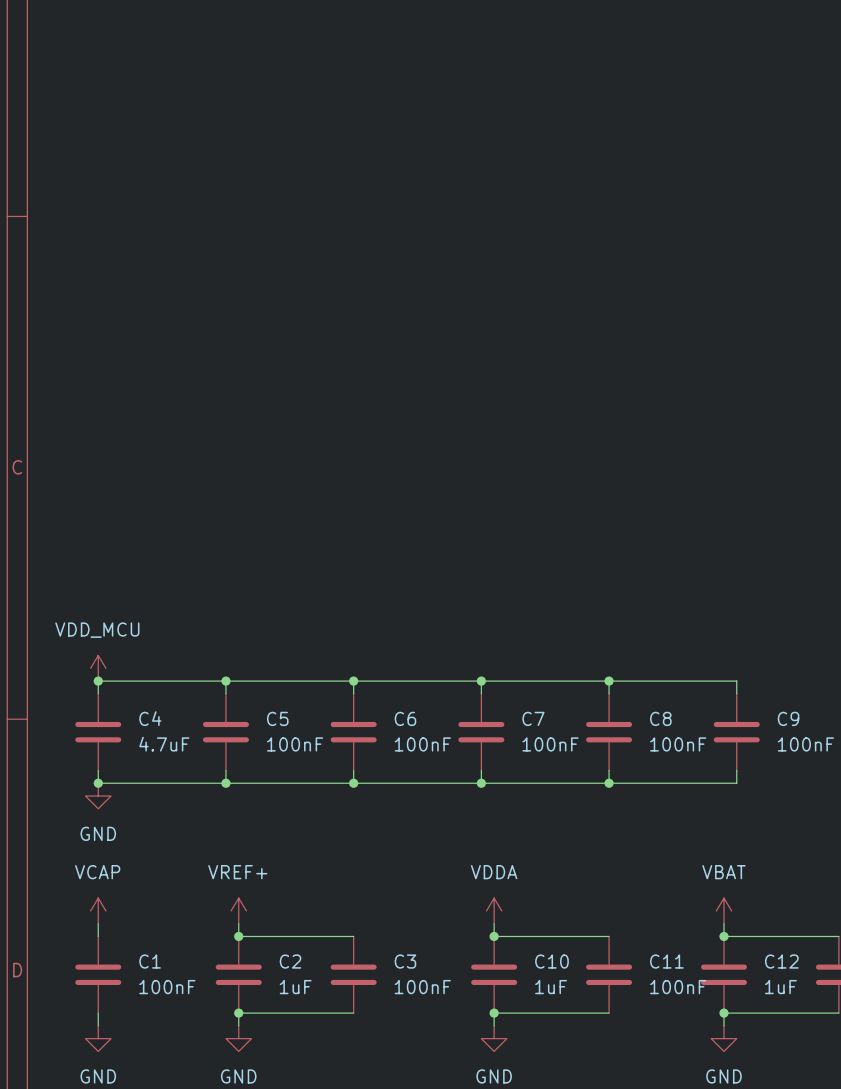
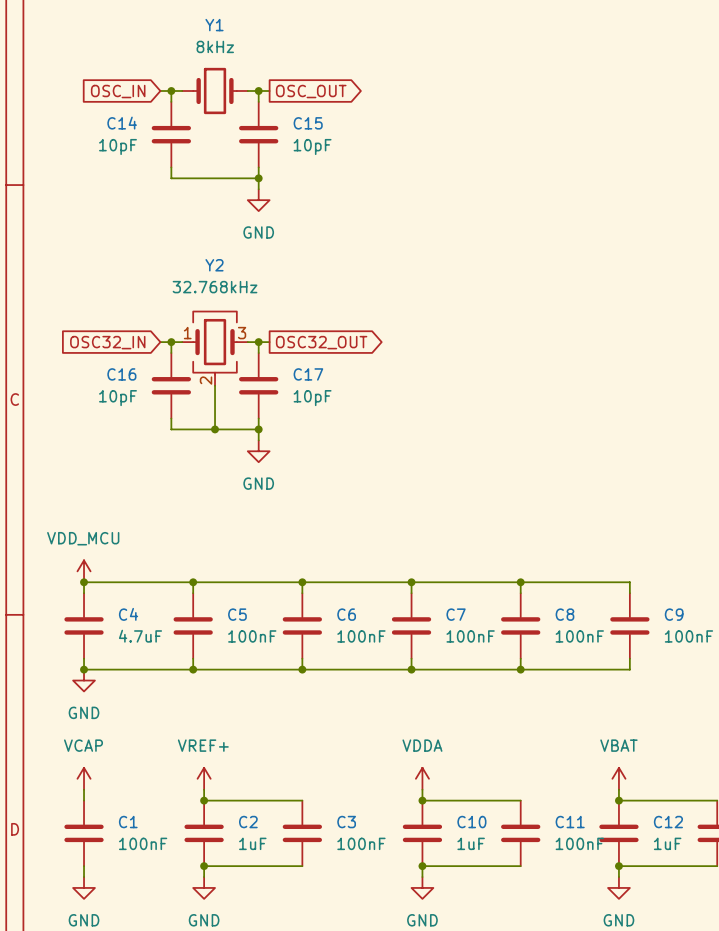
wire: none -> (160, 91) (182, 91)
wire: none -> (171, 91) (171, 101)
junction: none -> (171, 91)
Y1: none -> 8kHz (215, 91)
wire: none -> (247, 91) (269, 91)
wire: none -> (258, 91) (258, 101)
junction: none -> (258, 91)
global label: none -> OSC_IN (118, 91)
global label: none -> OSC_OUT (311, 91)
C14: none -> 10pF (171, 134)
C15: none -> 10pF (258, 134)
wire: none -> (171, 167) (171, 178) (258, 178)
wire: none -> (258, 167) (258, 189)
junction: none -> (258, 178)
power symbol: none -> GND (258, 200)
global label: none -> OSC32_IN (107, 342)
wire: none -> (160, 342) (182, 342)
wire: none -> (171, 342) (171, 353)
junction: none -> (171, 342)
wire: none -> (247, 342) (269, 342)
wire: none -> (258, 342) (258, 353)
junction: none -> (258, 342)
global label: none -> OSC32_OUT (321, 342)
Y2: none -> 32.768kHz (215, 348)
C16: none -> 10pF (171, 385)
wire: none -> (215, 385) (215, 429)
C17: none -> 10pF (258, 385)
wire: none -> (171, 418) (171, 429) (258, 429)
wire: none -> (258, 418) (258, 440)
junction: none -> (215, 429)
junction: none -> (258, 429)
power symbol: none -> GND (258, 451)

